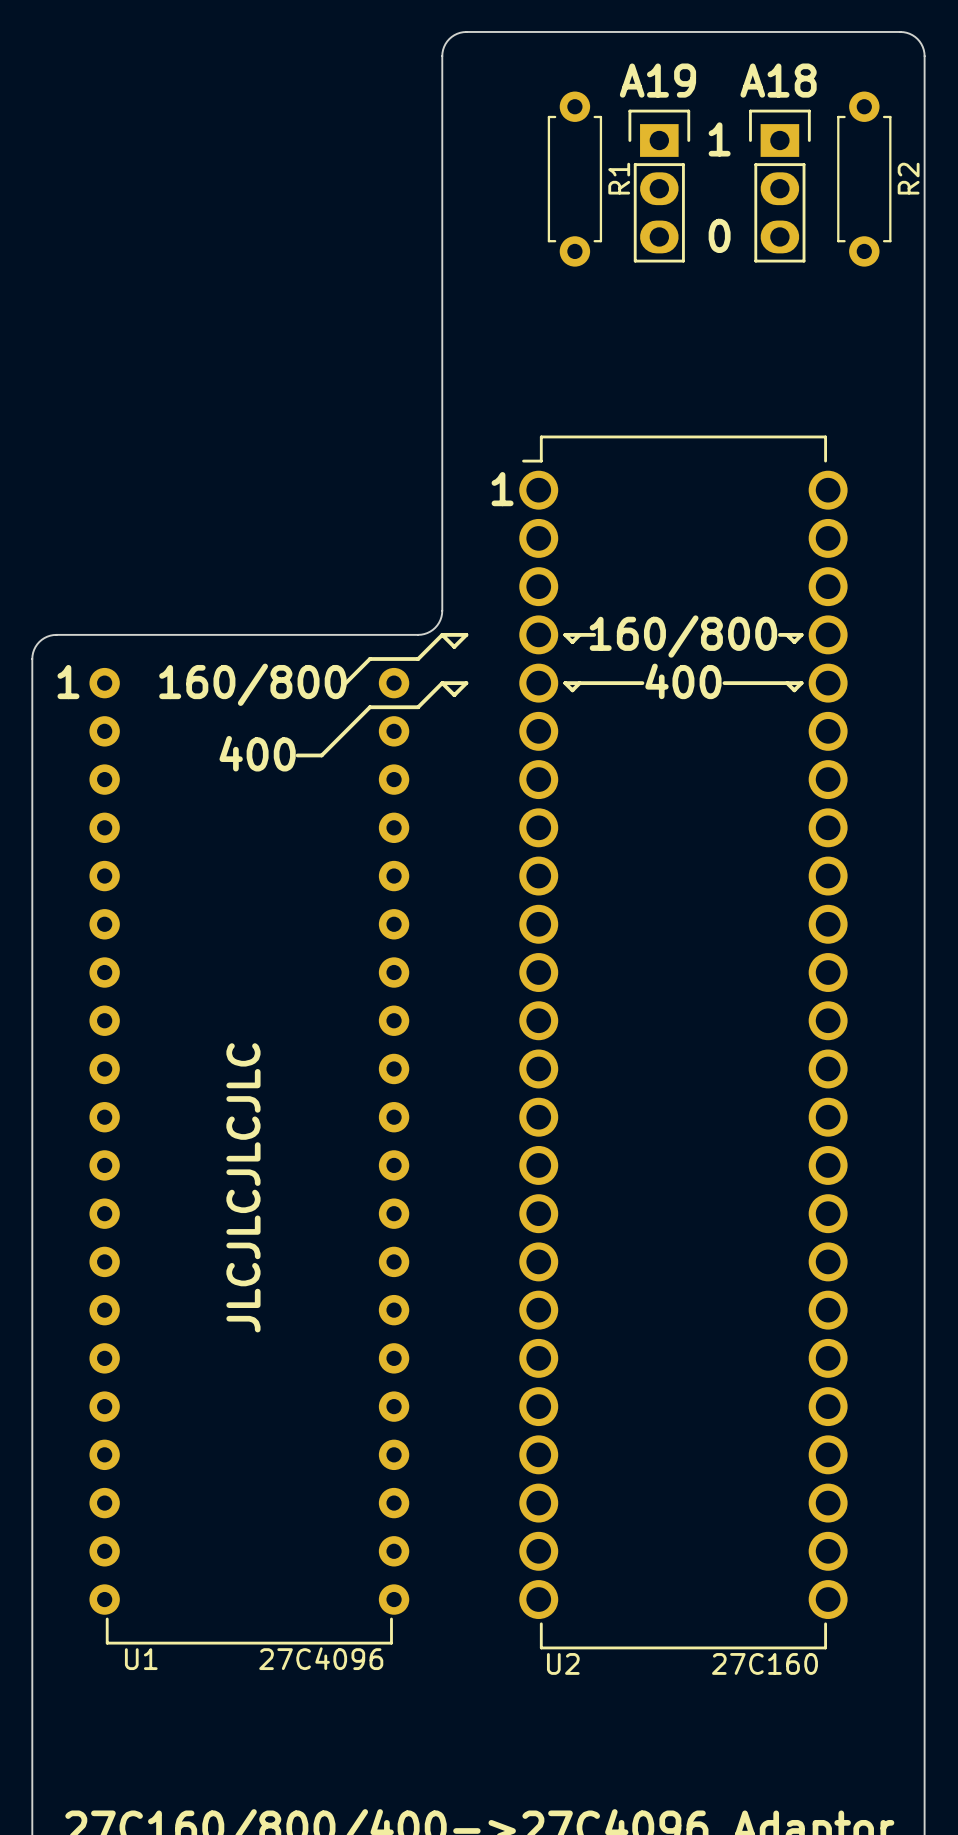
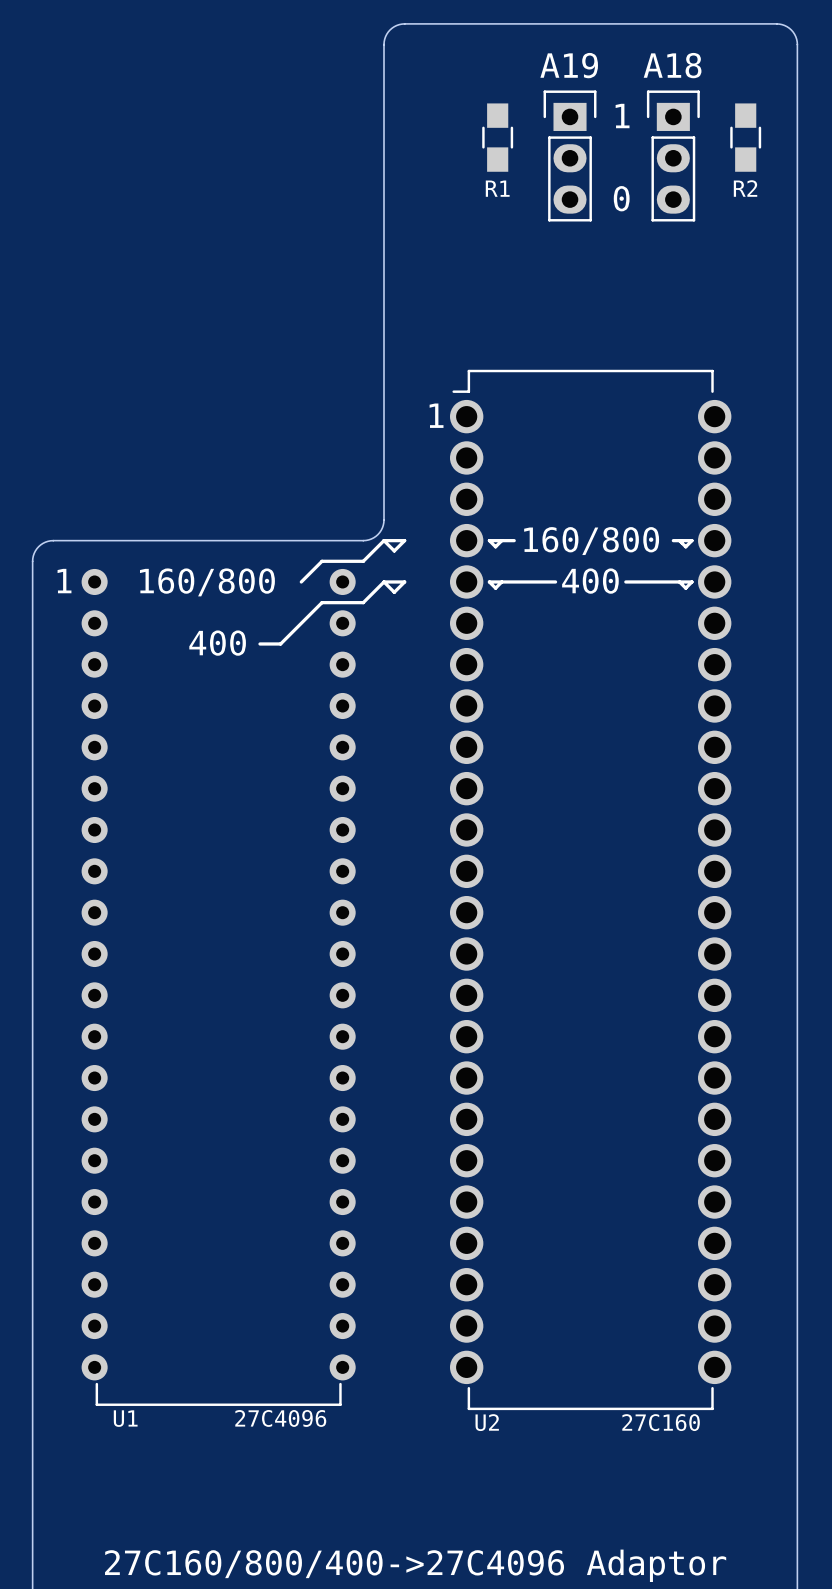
R1 footprint: [547, 91, 603, 267] -> [482, 103, 514, 172]
R2 footprint: [837, 91, 892, 267] -> [730, 103, 762, 172]
R1 name position: R1 (619, 178) -> R1 (497, 188)
R2 name position: R2 (908, 178) -> R2 (745, 188)
text: JLCJLCJLCJLC (243, 1187) -> none

